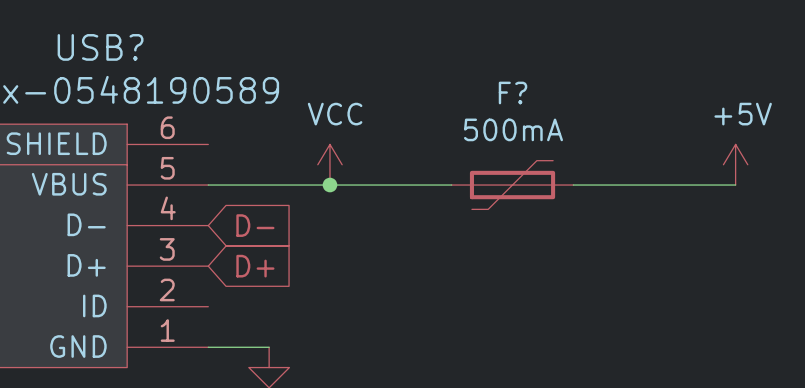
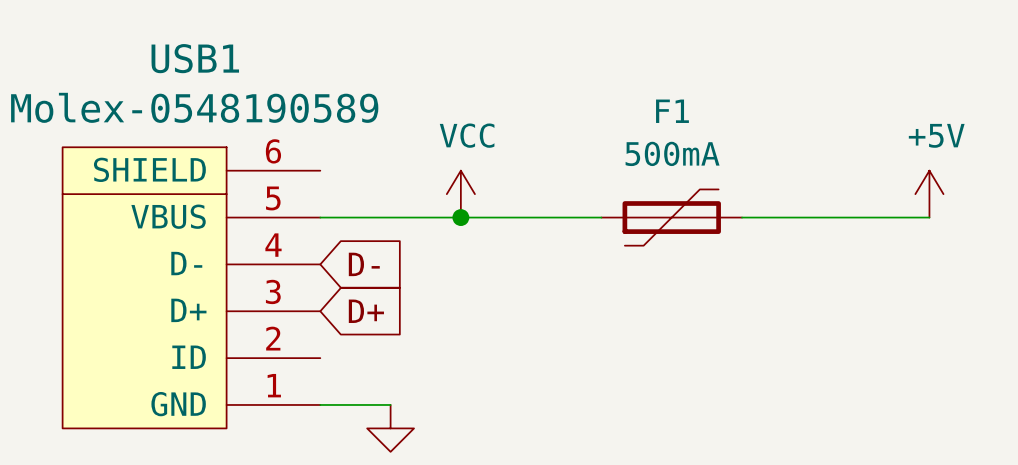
USB? name: USB? (100, 47) -> USB1 (195, 58)
F? name: F? (513, 92) -> F1 (672, 111)

